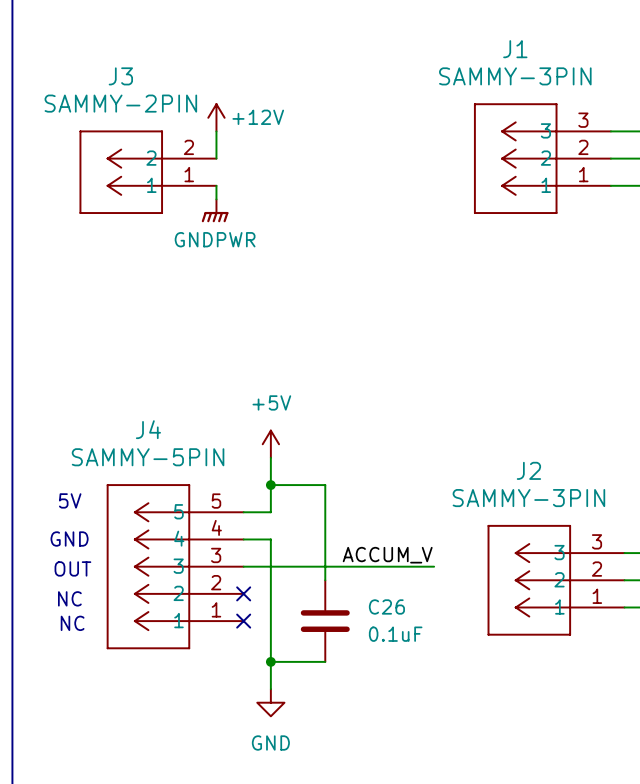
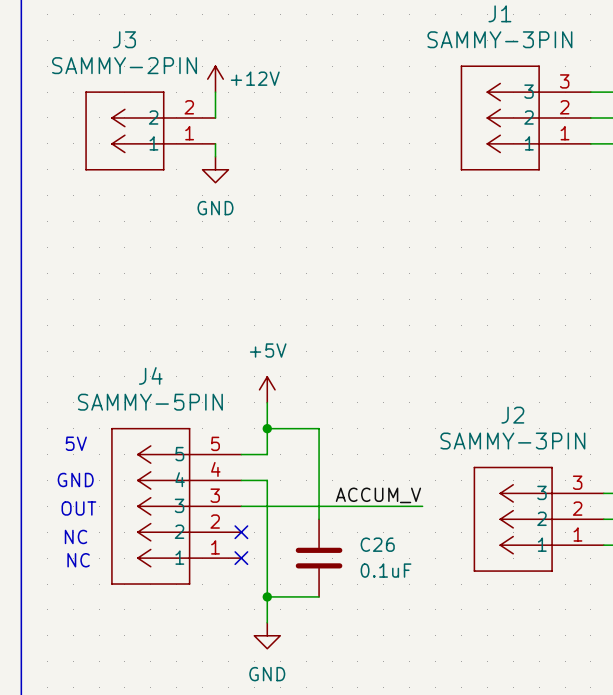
power symbol: GNDPWR (215, 210) -> GND (215, 169)

